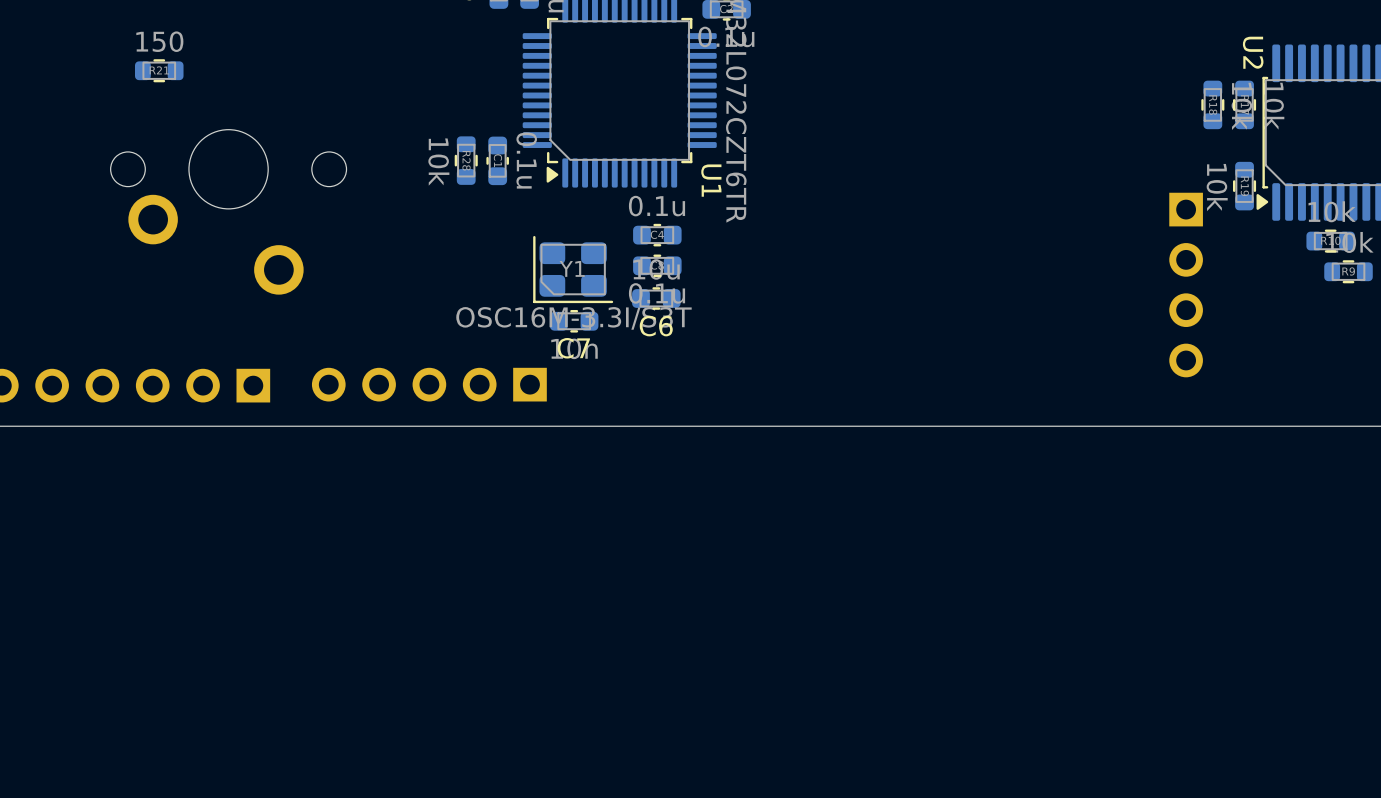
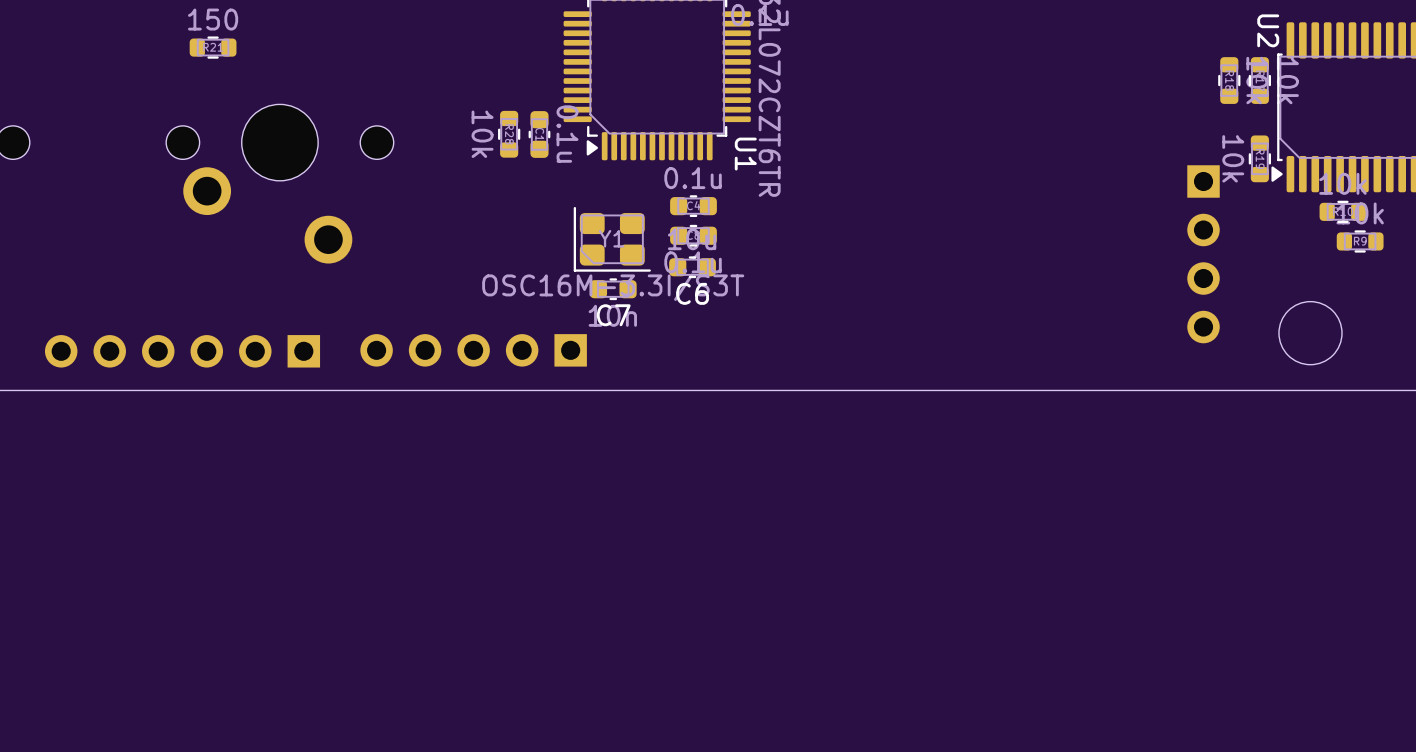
round board edge: none -> [1278, 301, 1343, 366]

